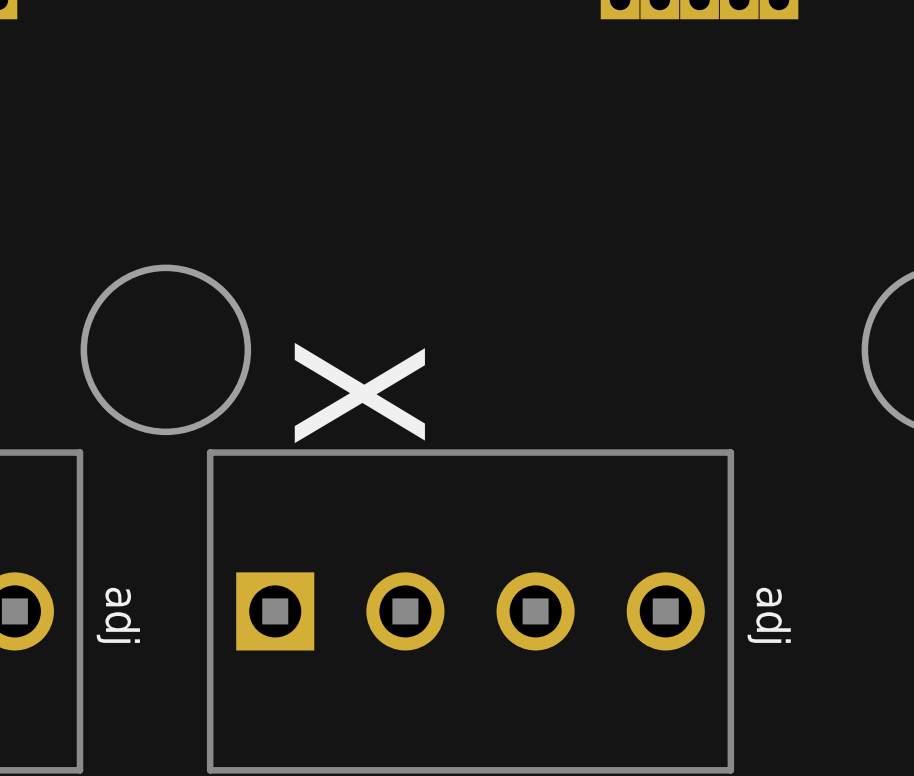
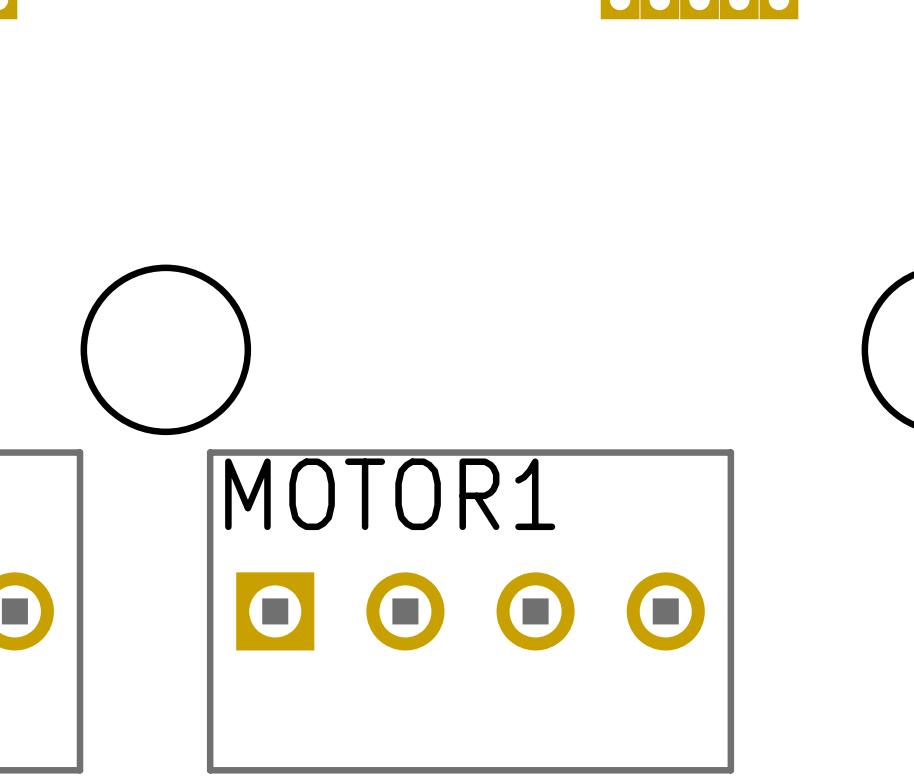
X name: X (359, 392) -> MOTOR1 (390, 494)
text: adj (118, 615) -> none
text: adj (769, 615) -> none

